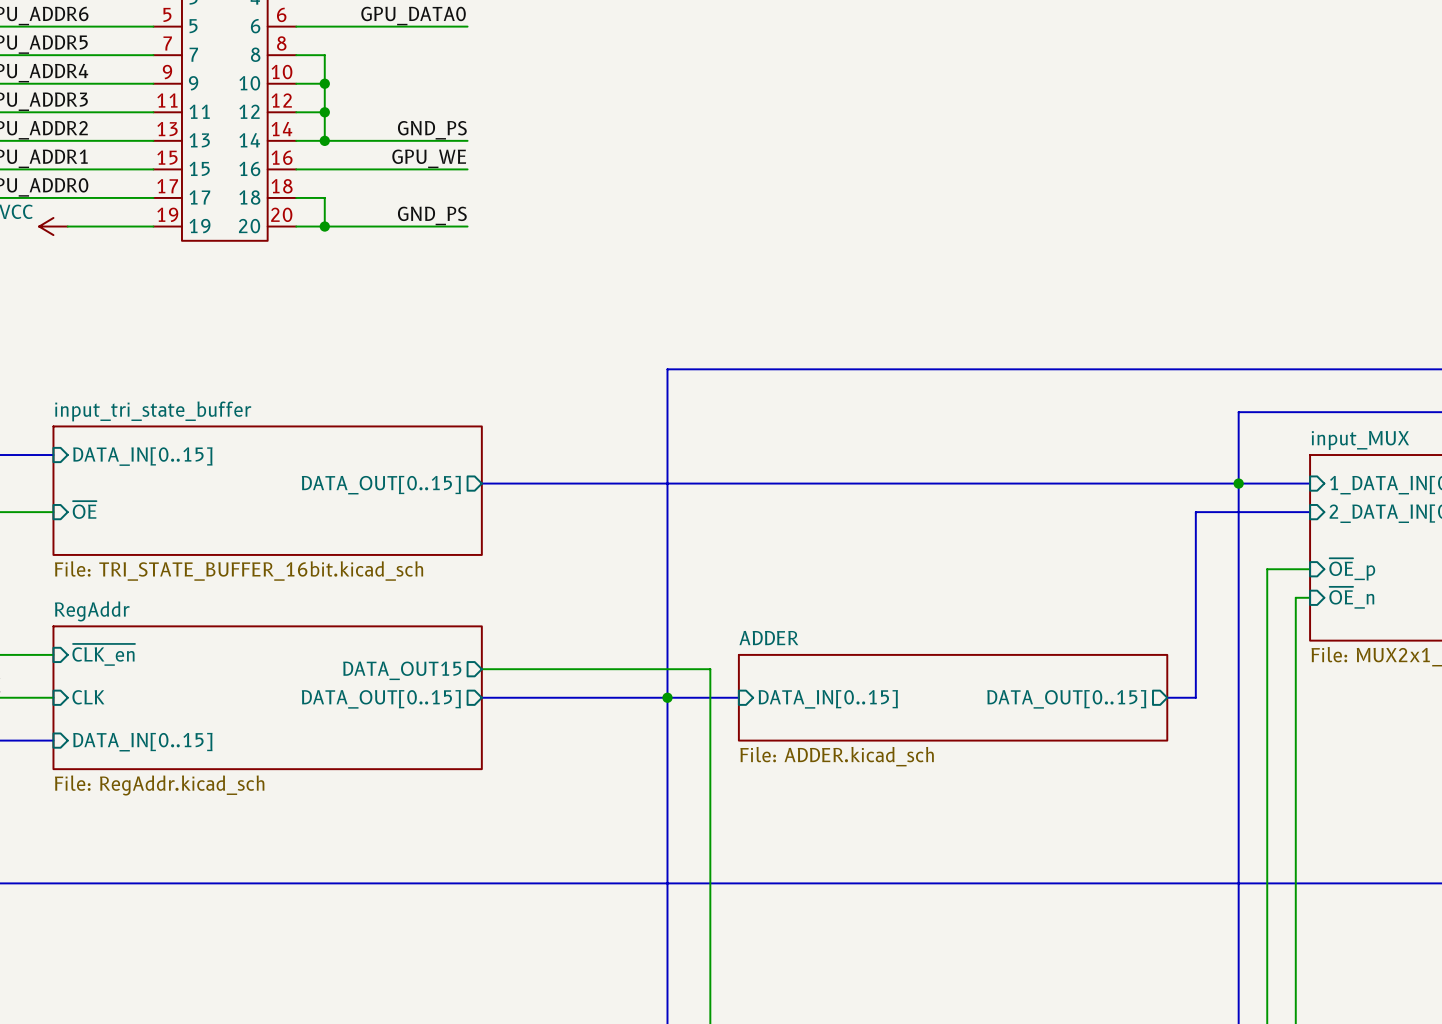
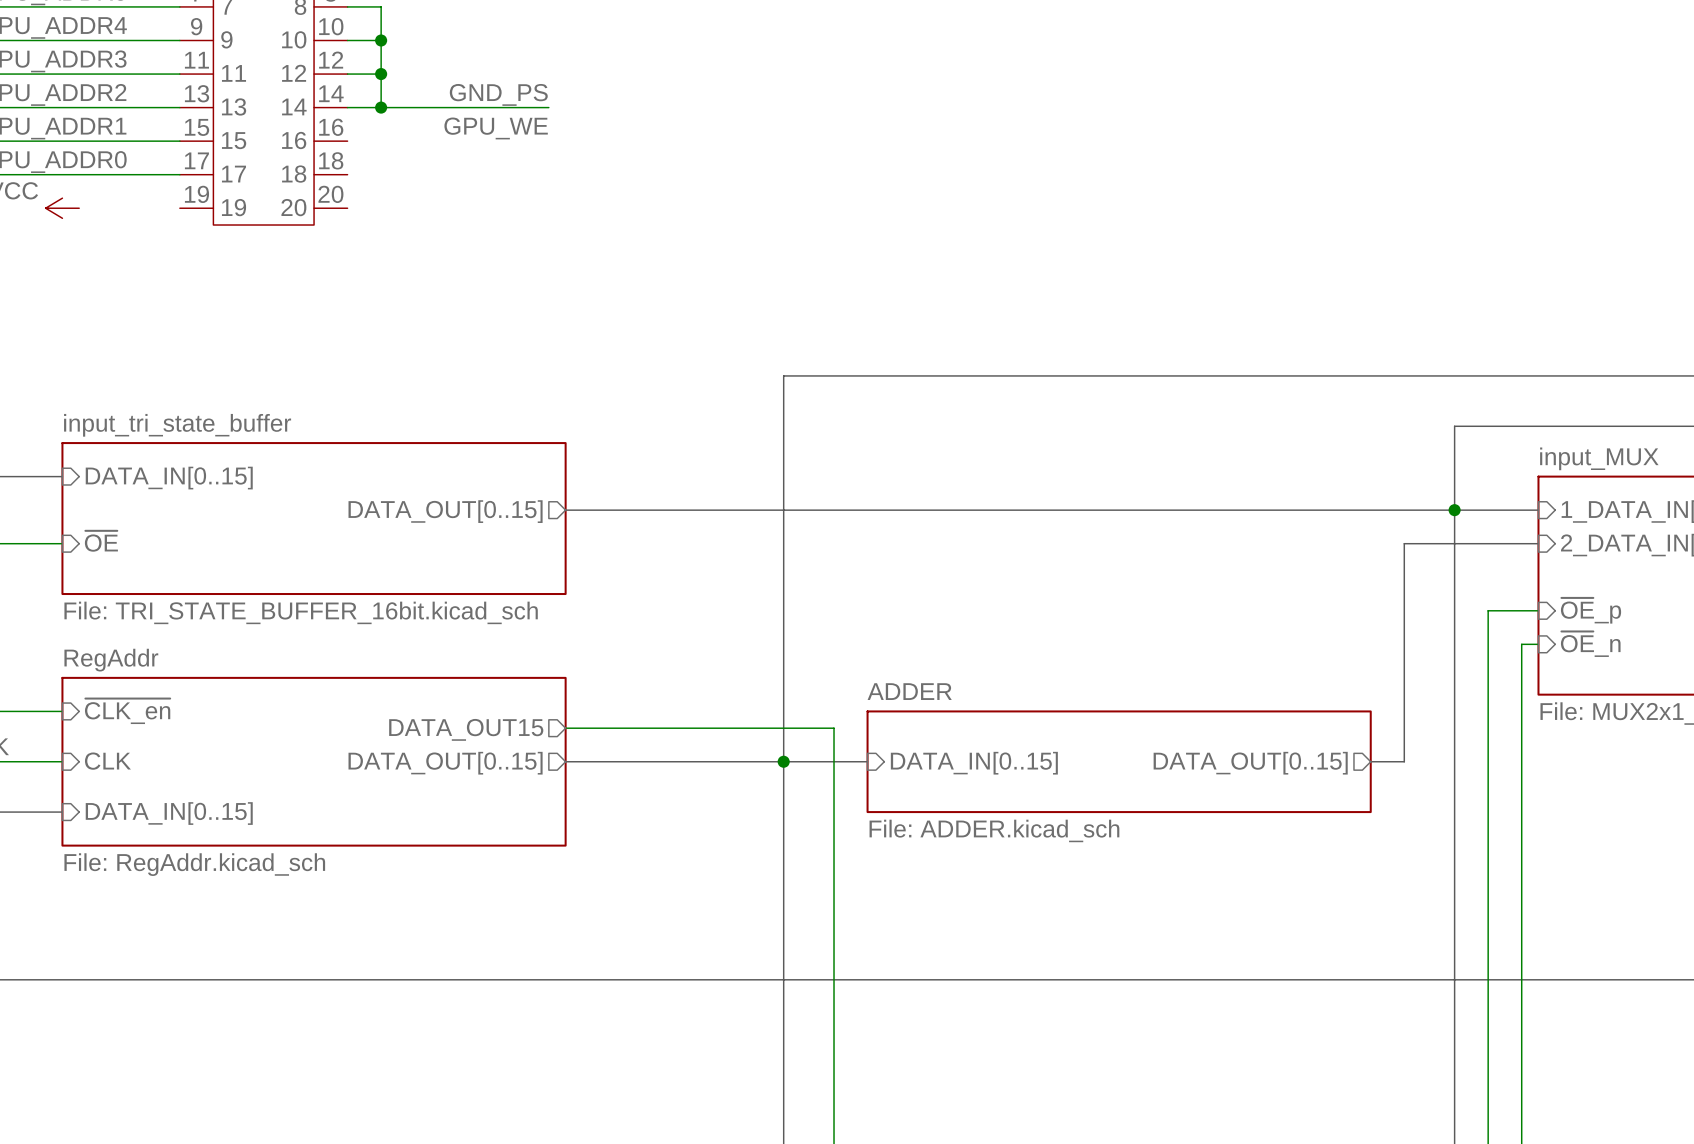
wire: (296, 169) (467, 169) -> none
wire: (296, 197) (324, 197) (324, 226) -> none
label: GND_PS (432, 215) -> none
wire: (67, 226) (153, 226) -> none
wire: (296, 226) (467, 226) -> none
junction: (324, 226) -> none

